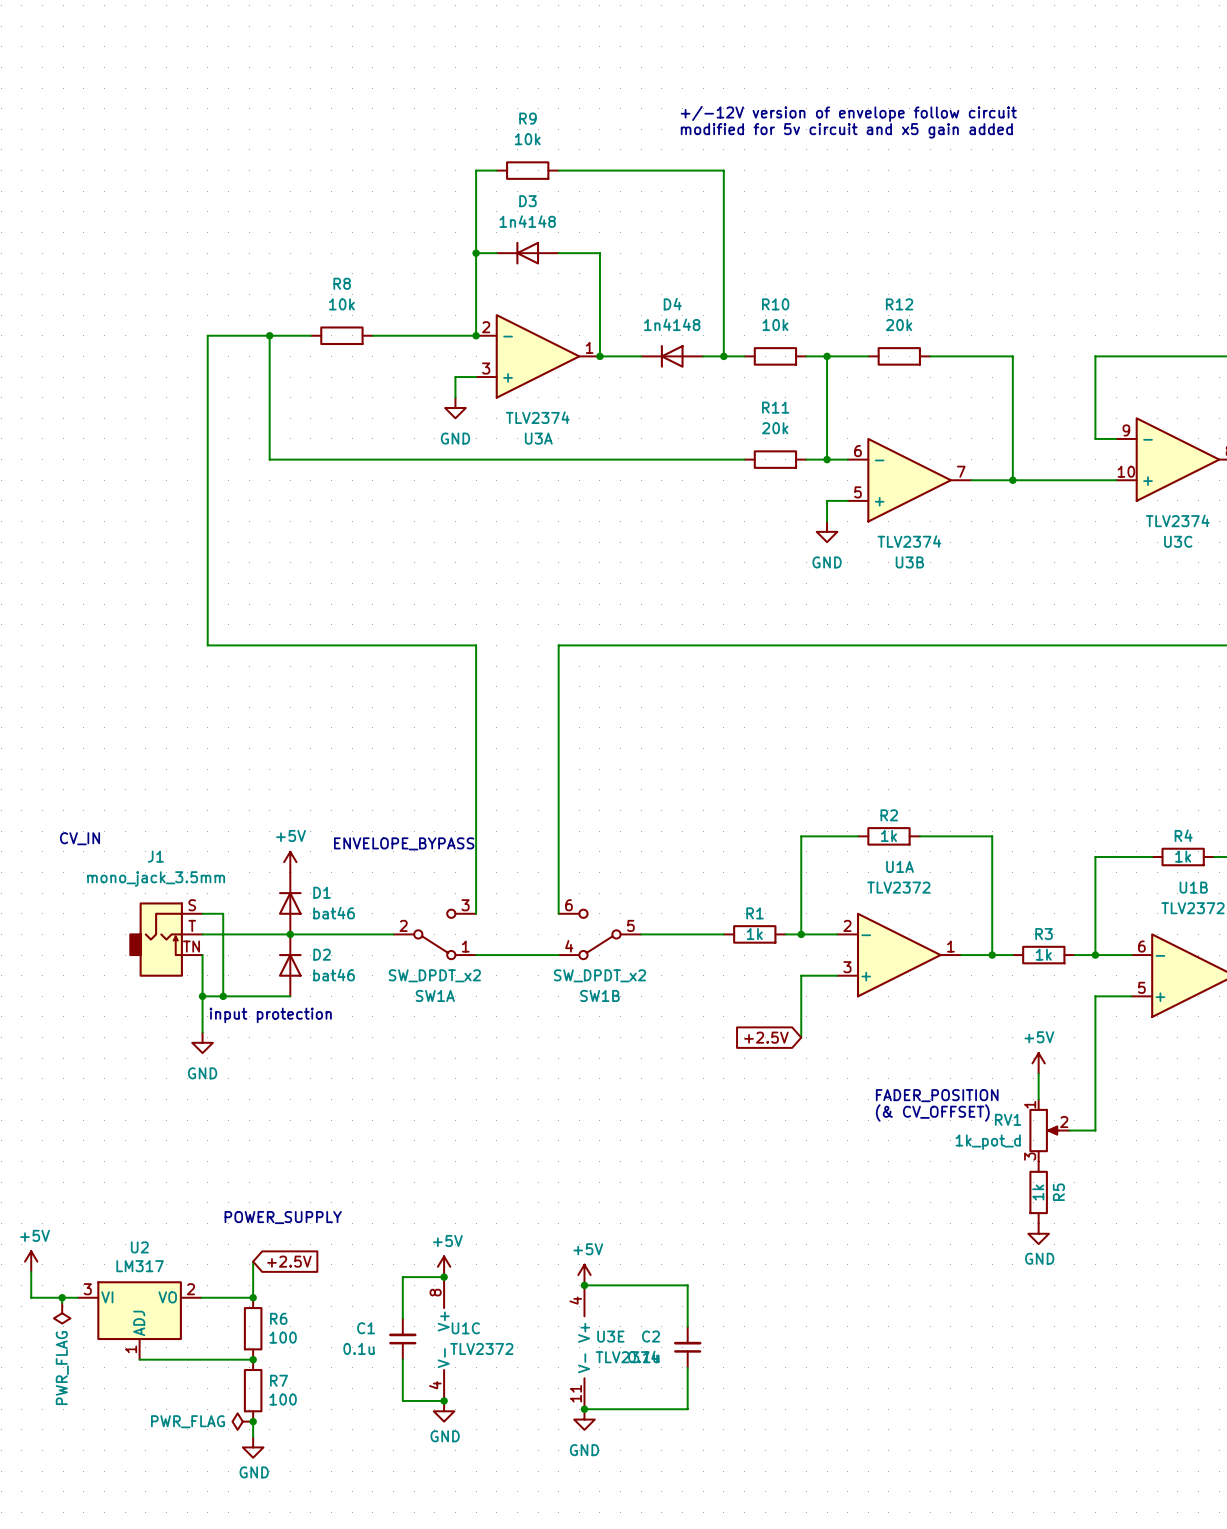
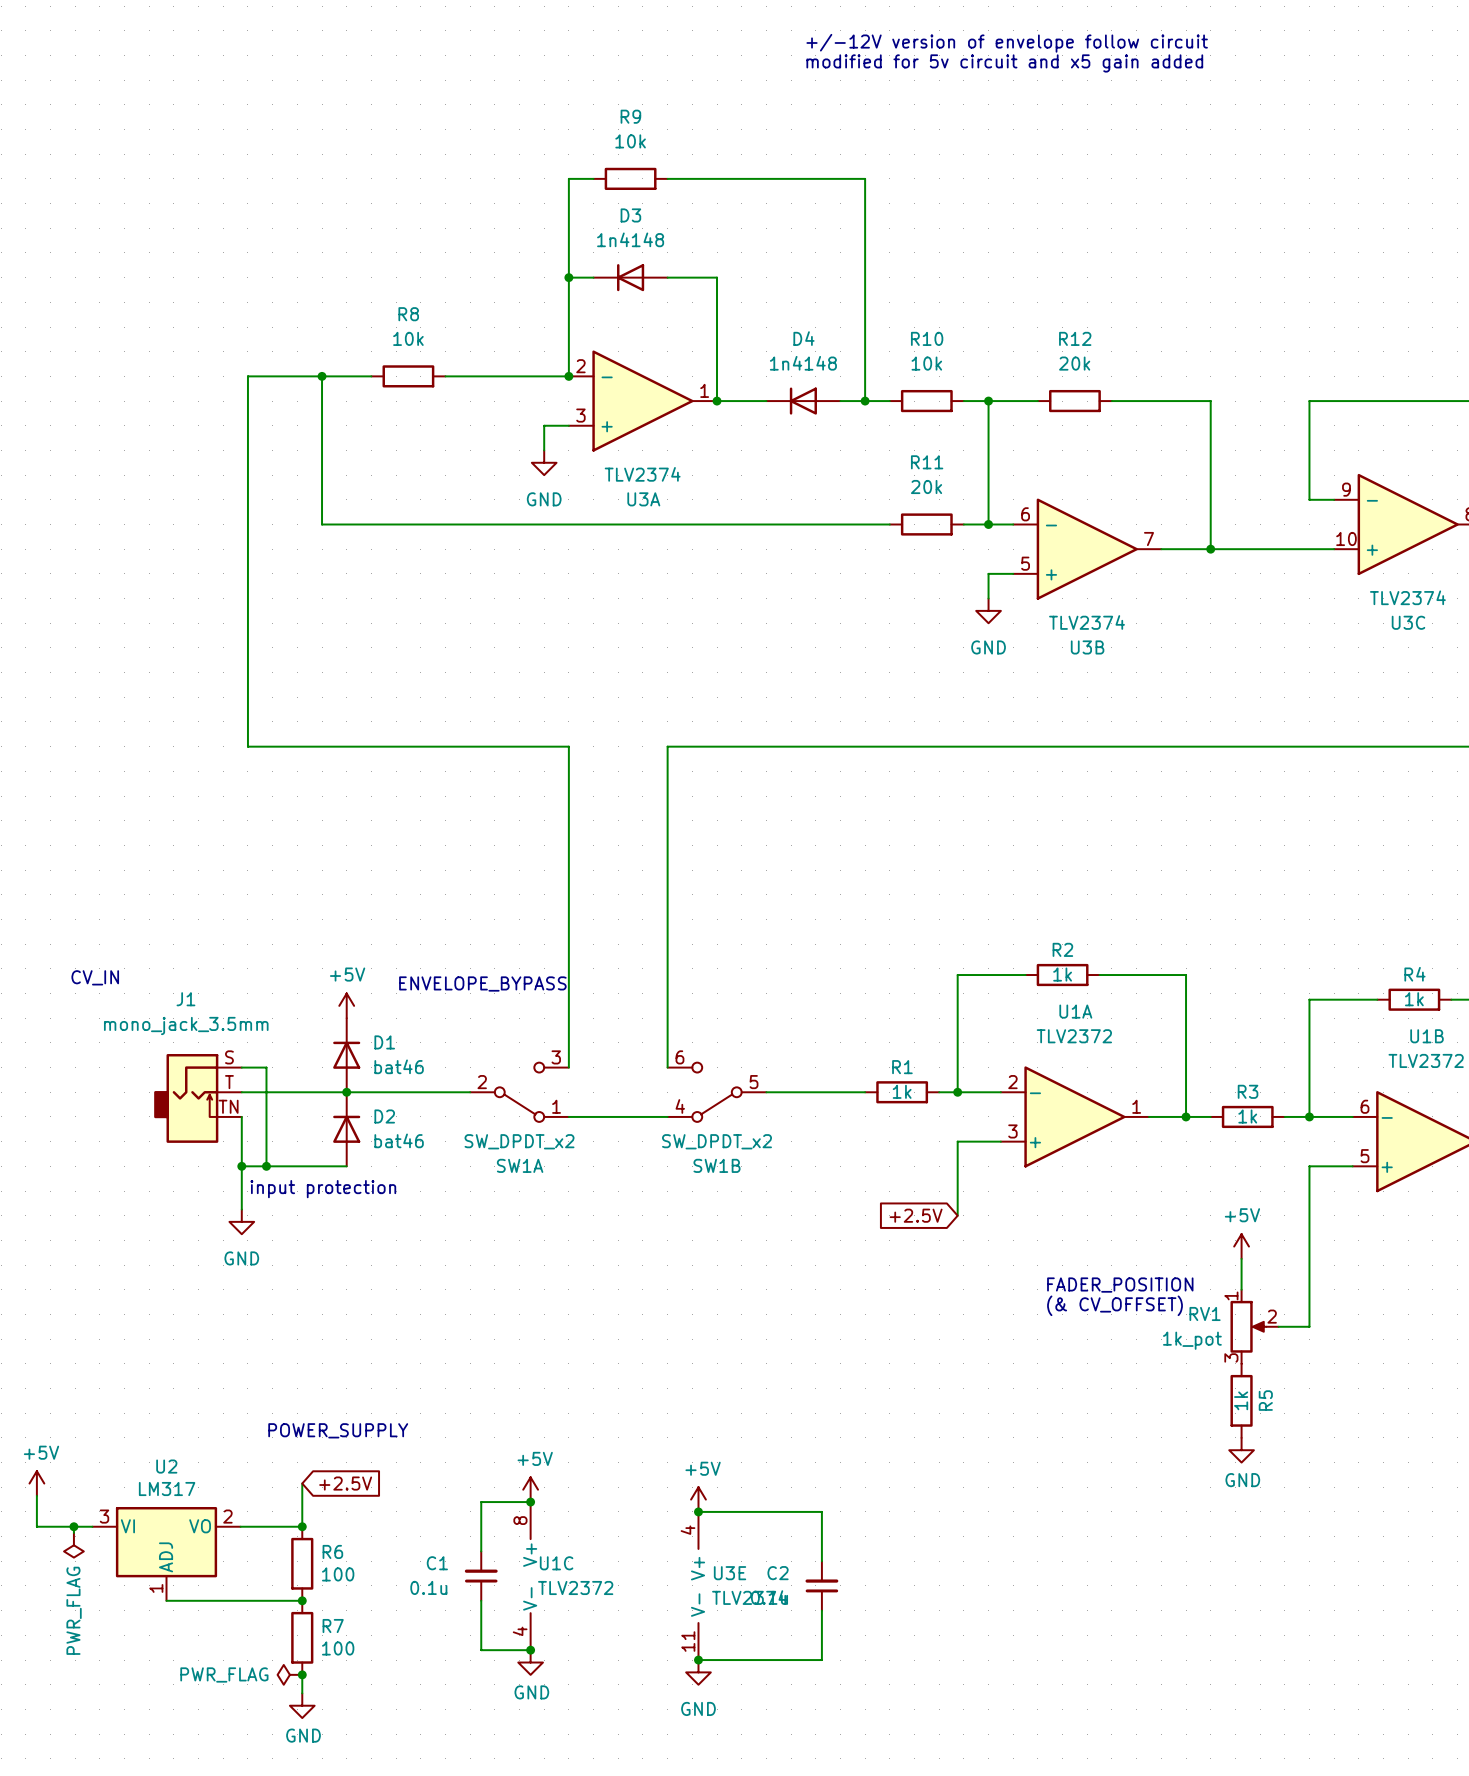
text position: +/-12V version of envelope follow circuit (848, 113) -> +/-12V version of envelope follow circuit (1007, 43)
text position: modified for 5v circuit and x5 gain added (846, 130) -> modified for 5v circuit and x5 gain added (1004, 63)
RV1 value: 1k_pot_d (988, 1142) -> 1k_pot (1192, 1340)

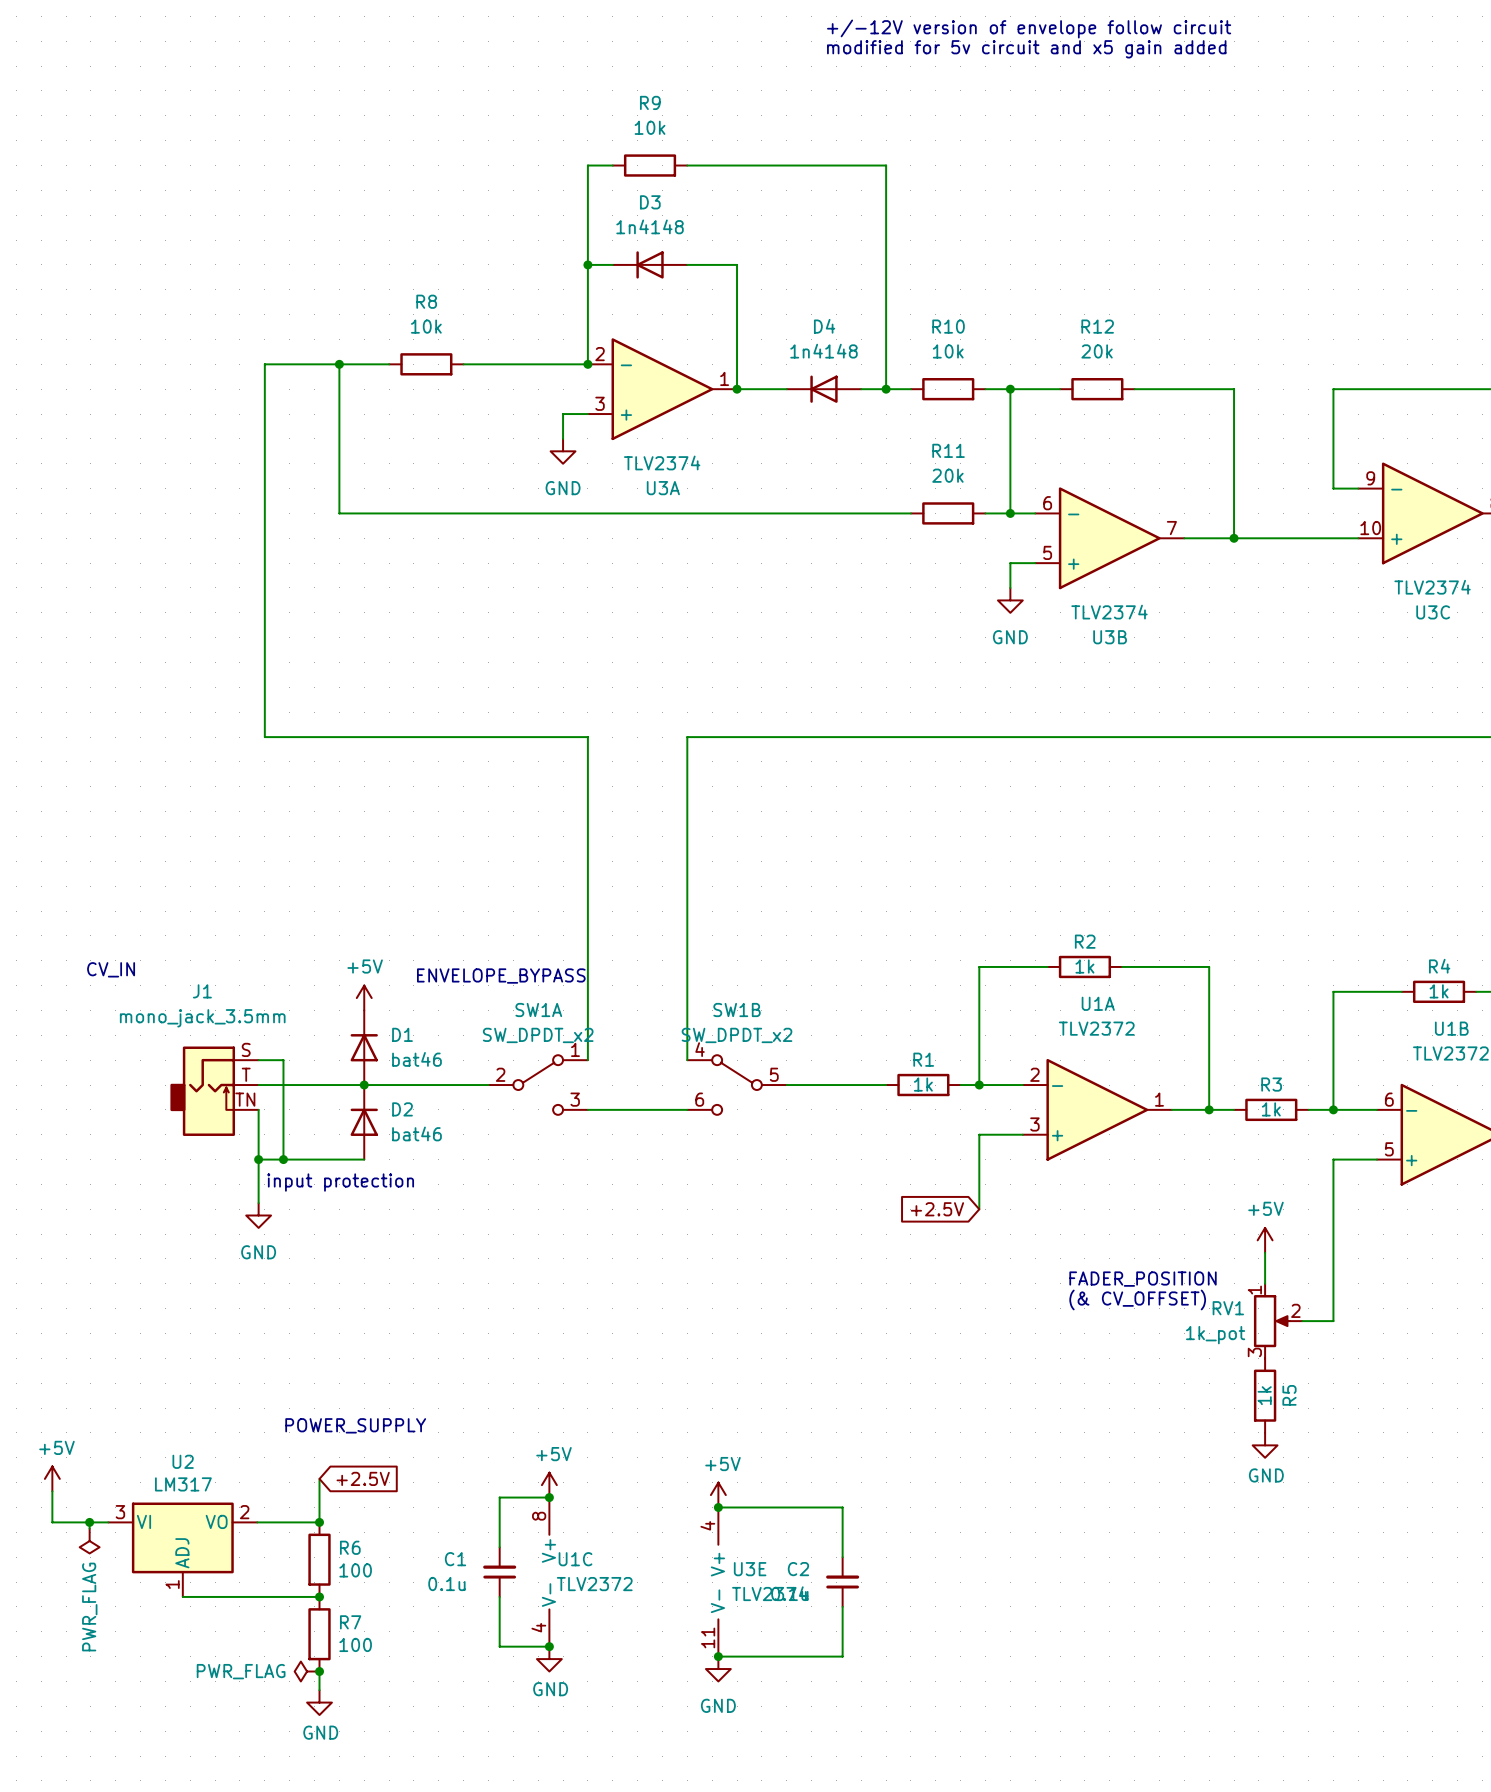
SW1A flip: as is (519, 1092) -> up-down (538, 1085)
SW1B flip: as is (717, 1092) -> up-down (737, 1085)

